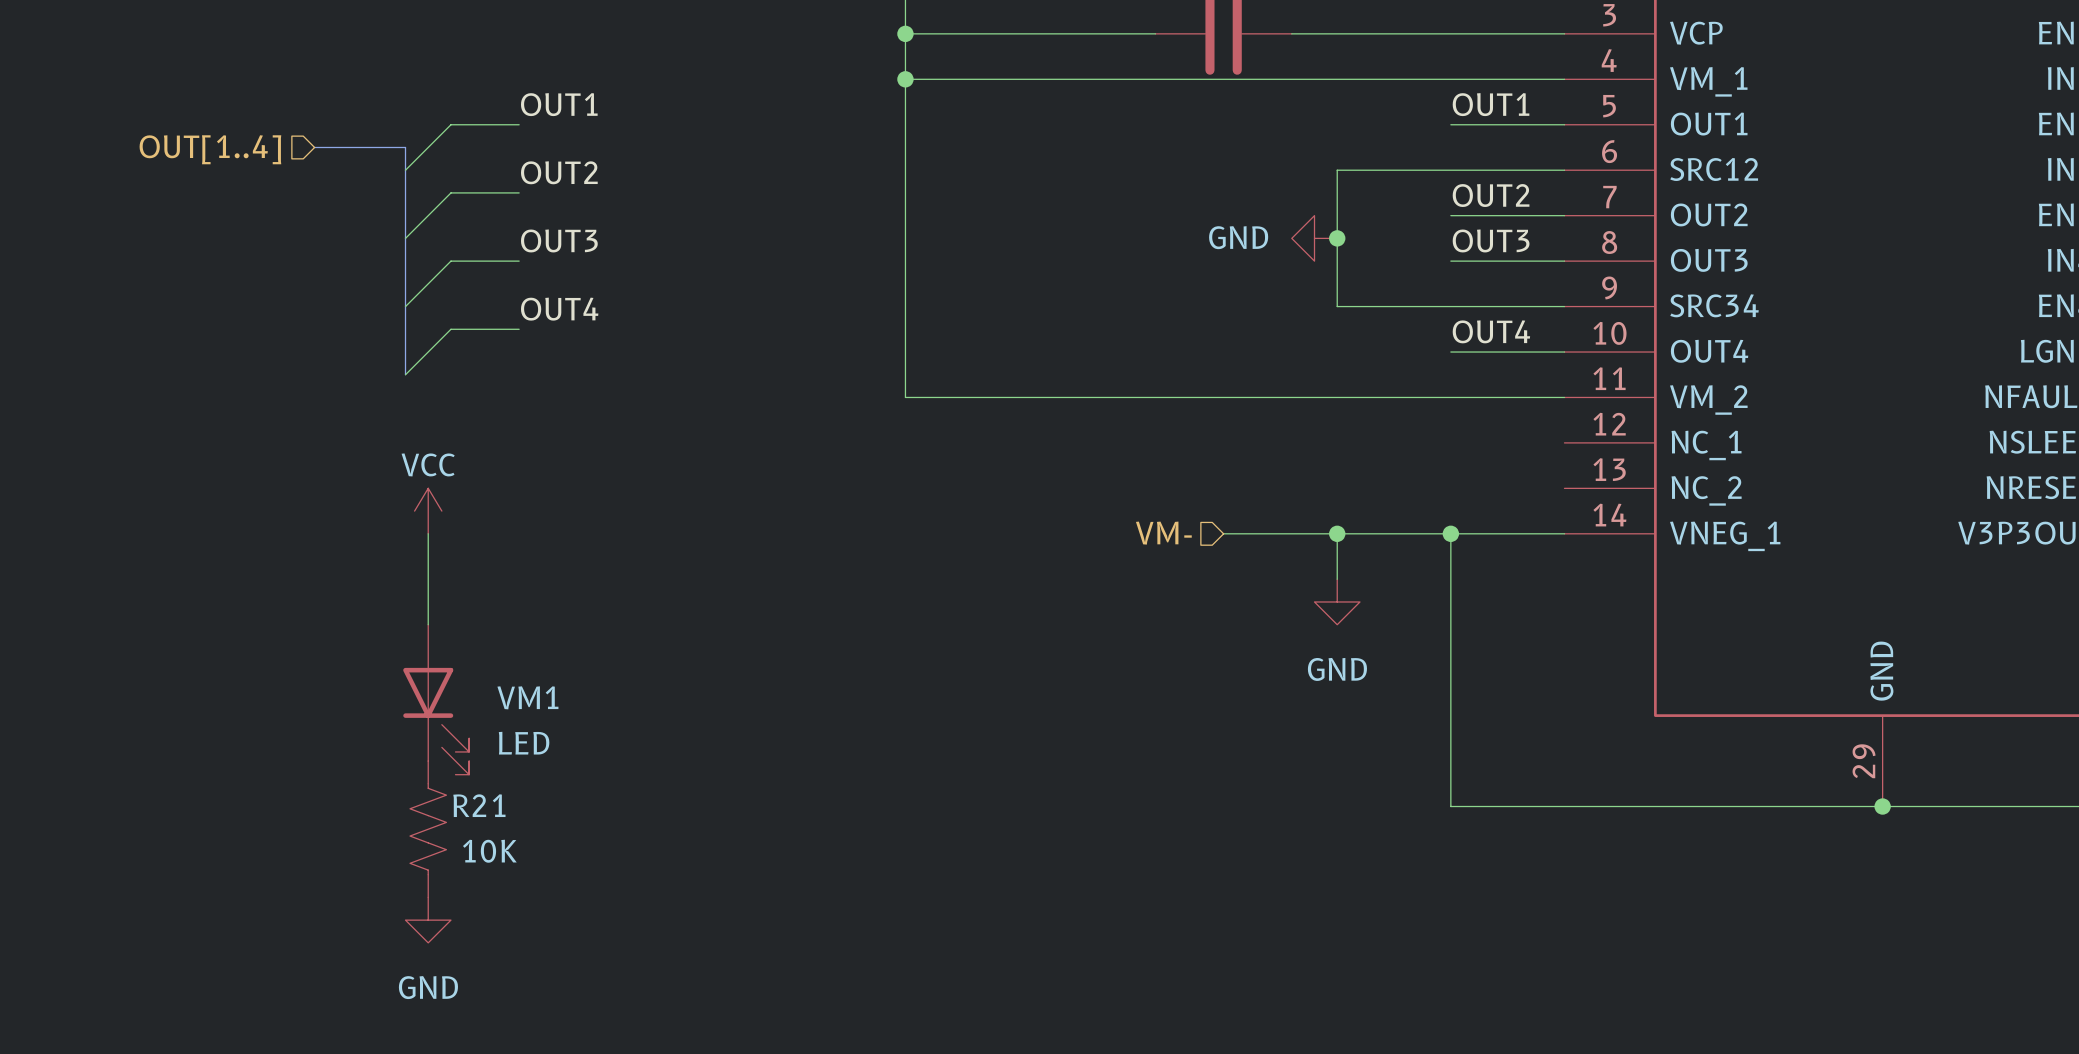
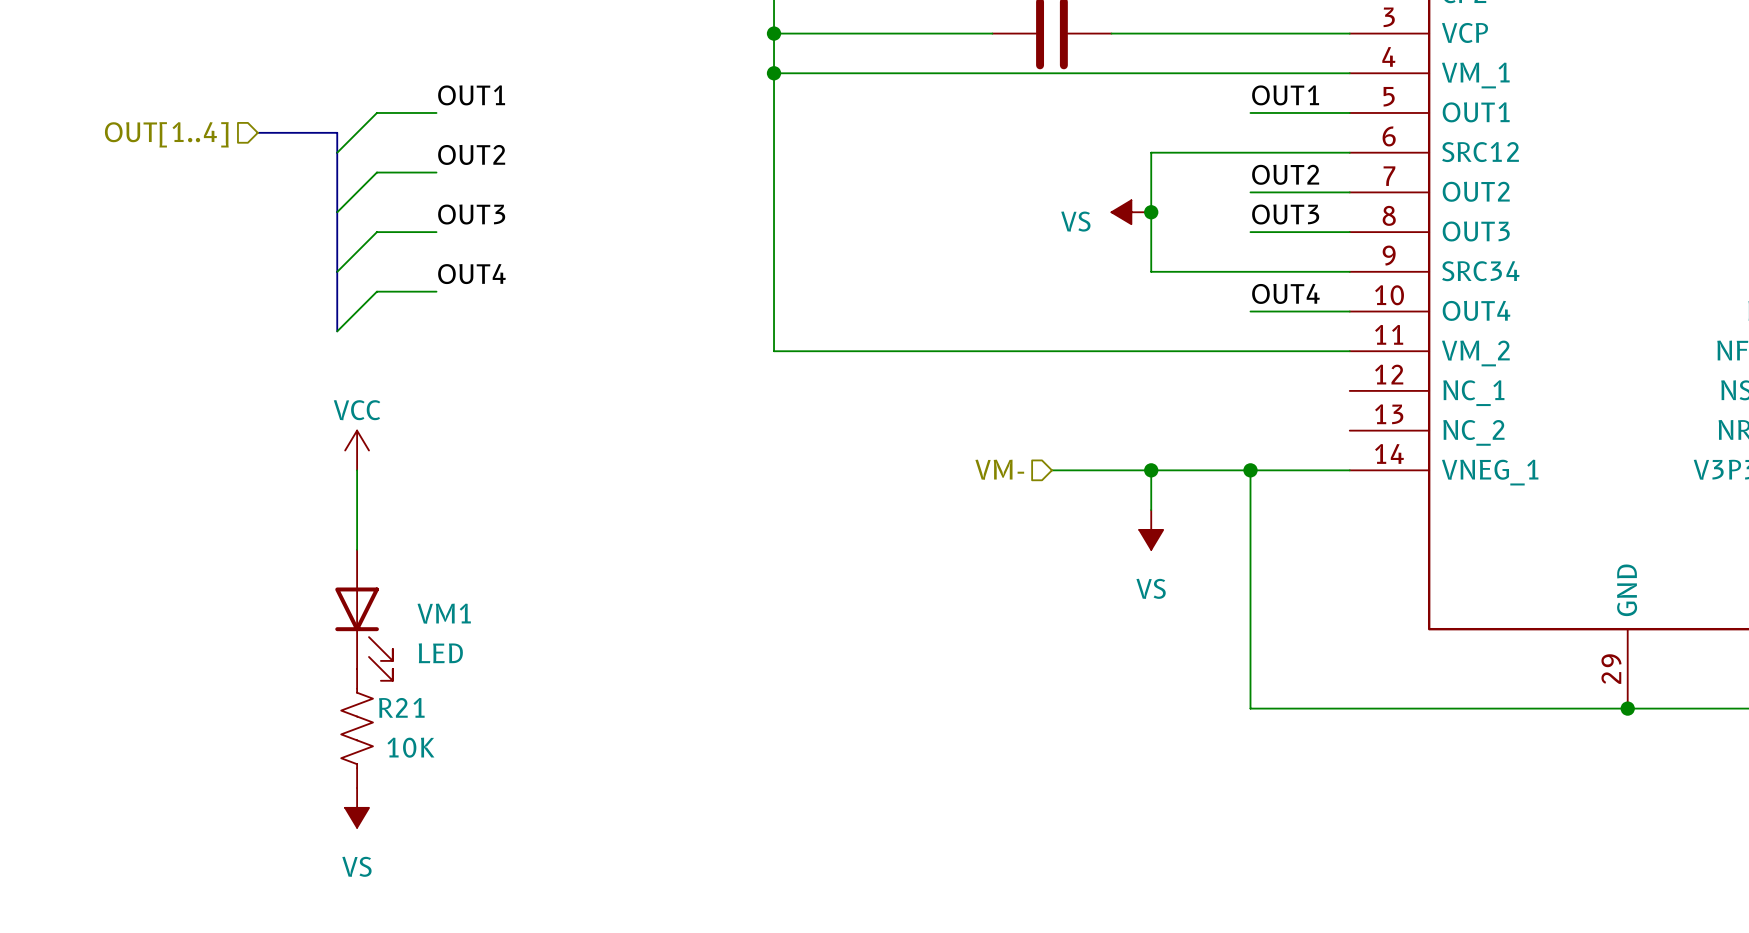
power symbol: GND (1314, 238) -> VS (1131, 212)
power symbol: GND (1337, 601) -> VS (1151, 529)
power symbol: GND (428, 920) -> VS (357, 807)

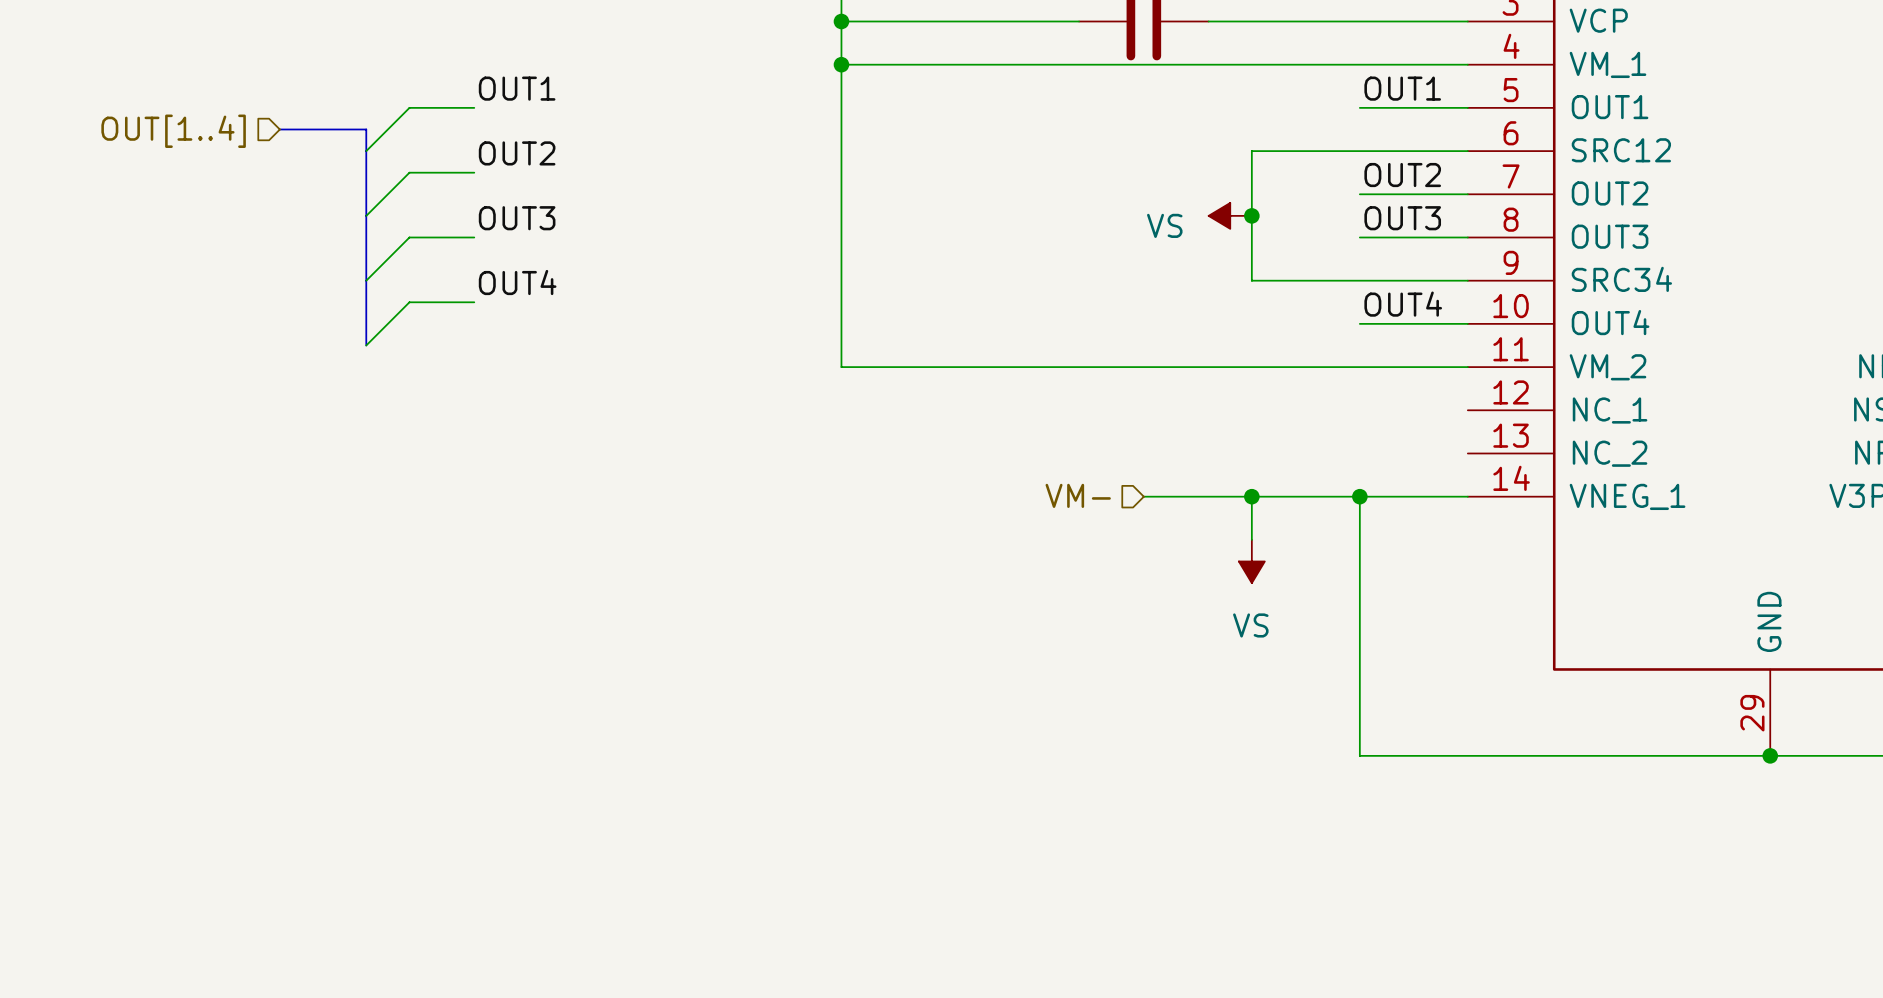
power symbol: VCC (357, 450) -> none
wire: (357, 470) (357, 549) -> none
VM1: LED (364, 615) -> none
R21: 10K (357, 728) -> none
power symbol: VS (357, 807) -> none

